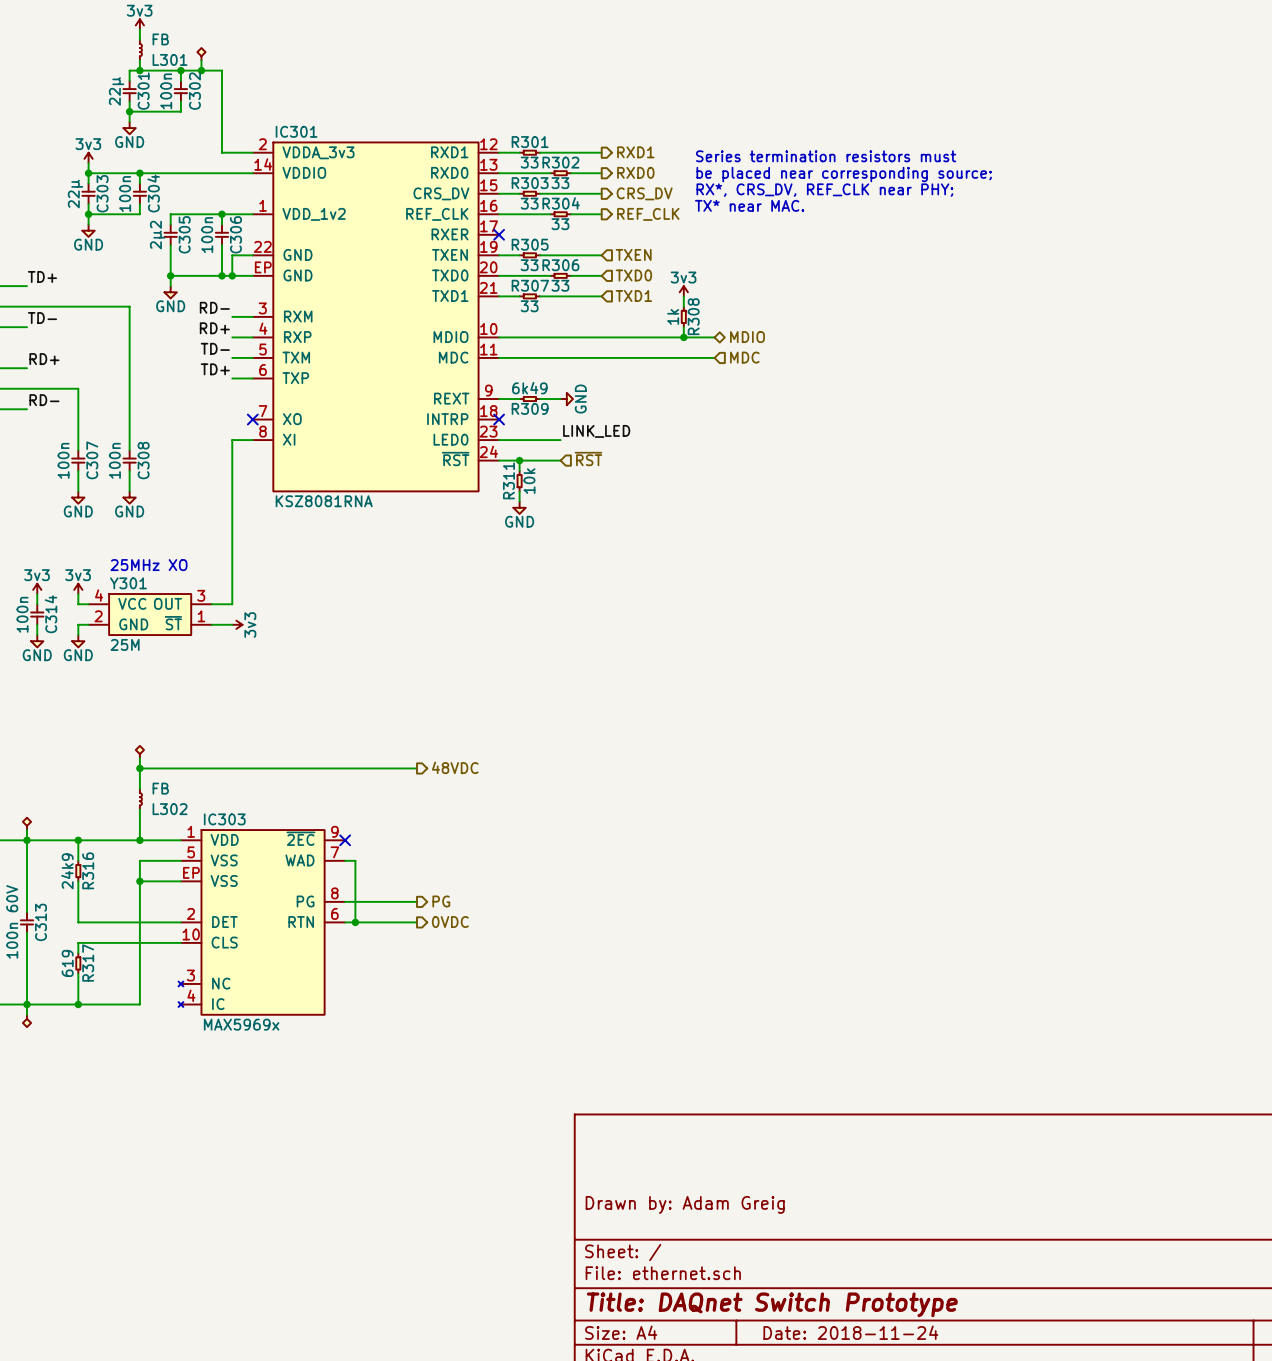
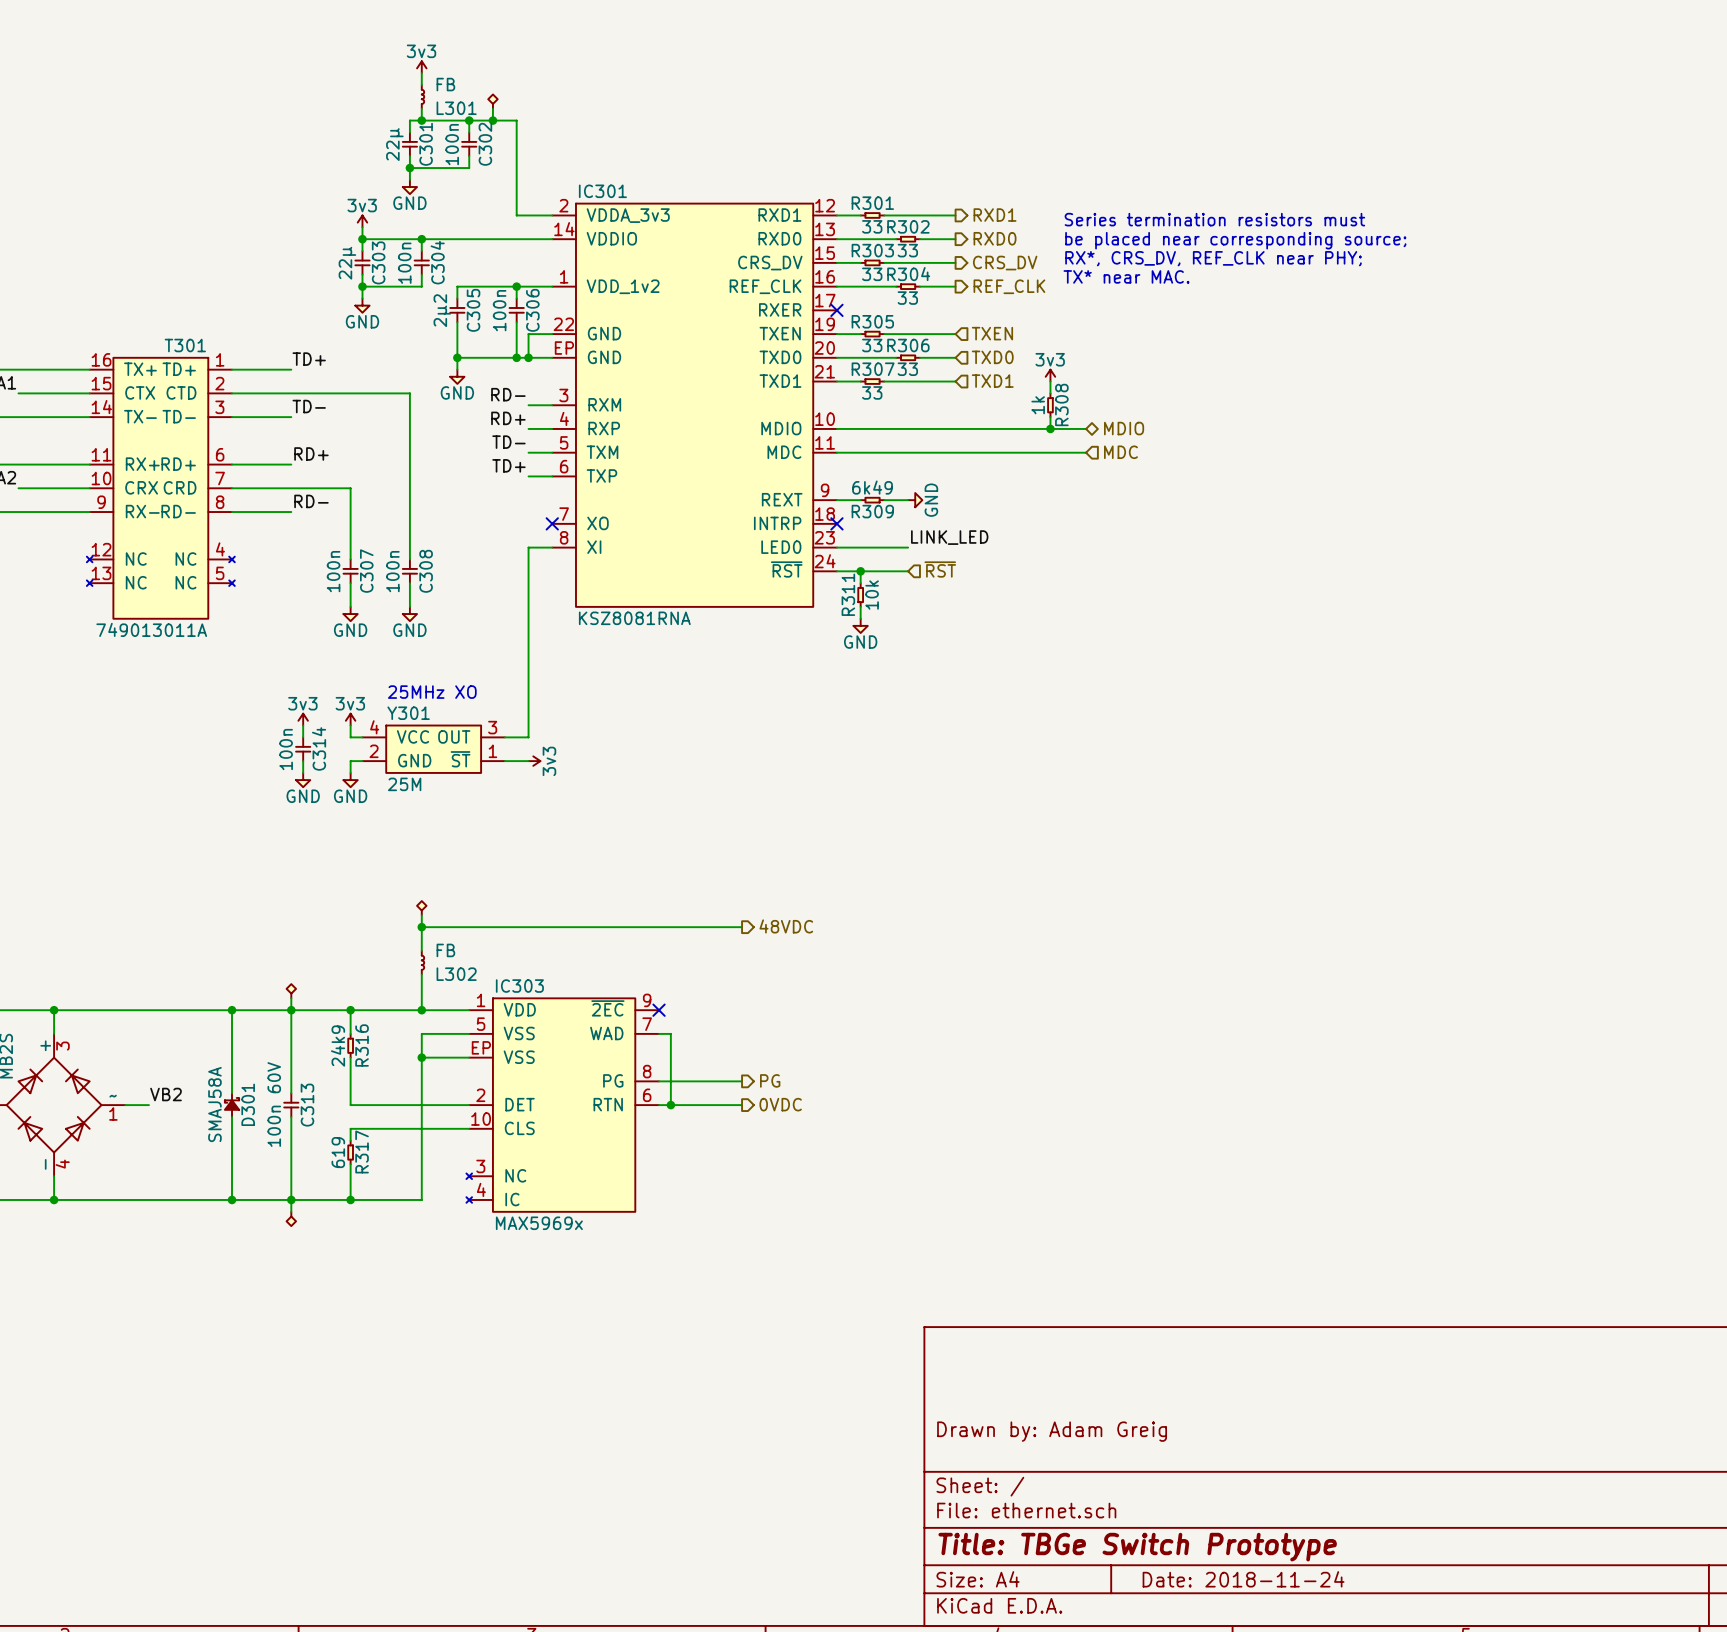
title block: Title: DAQnet Switch Prototype (772, 1304) -> Title: TBGe Switch Prototype (1137, 1547)

